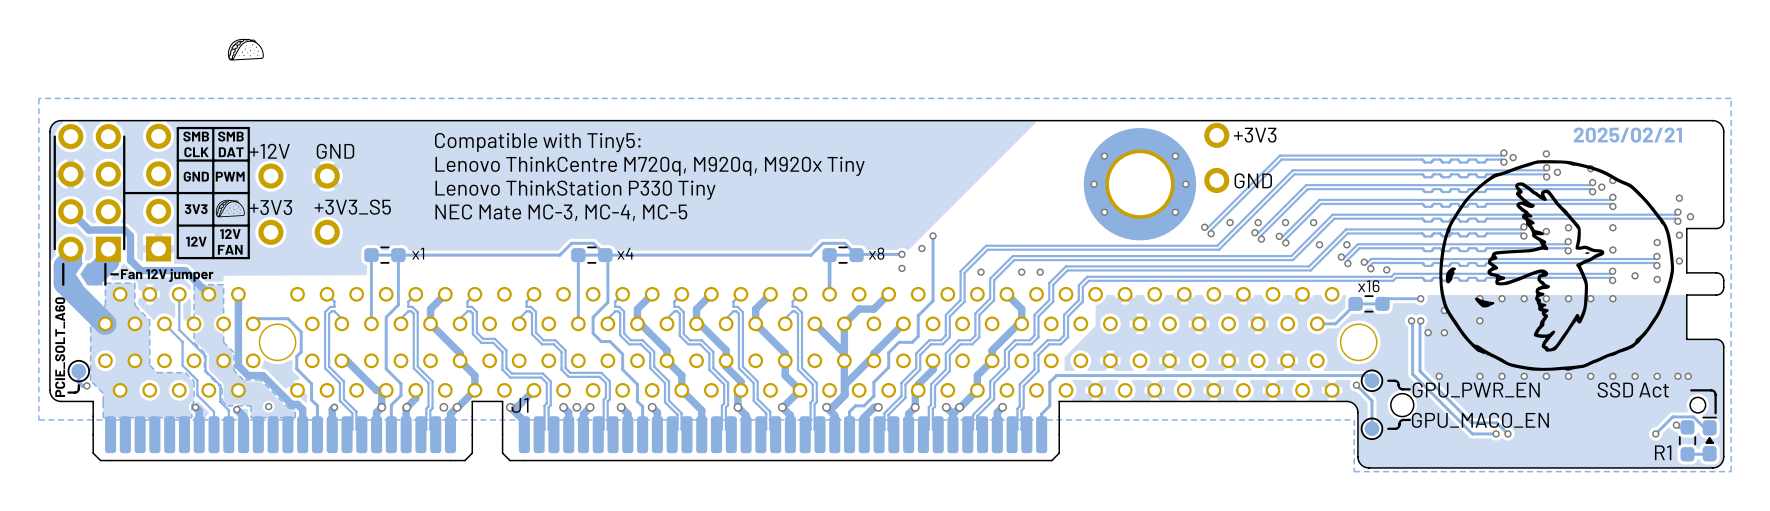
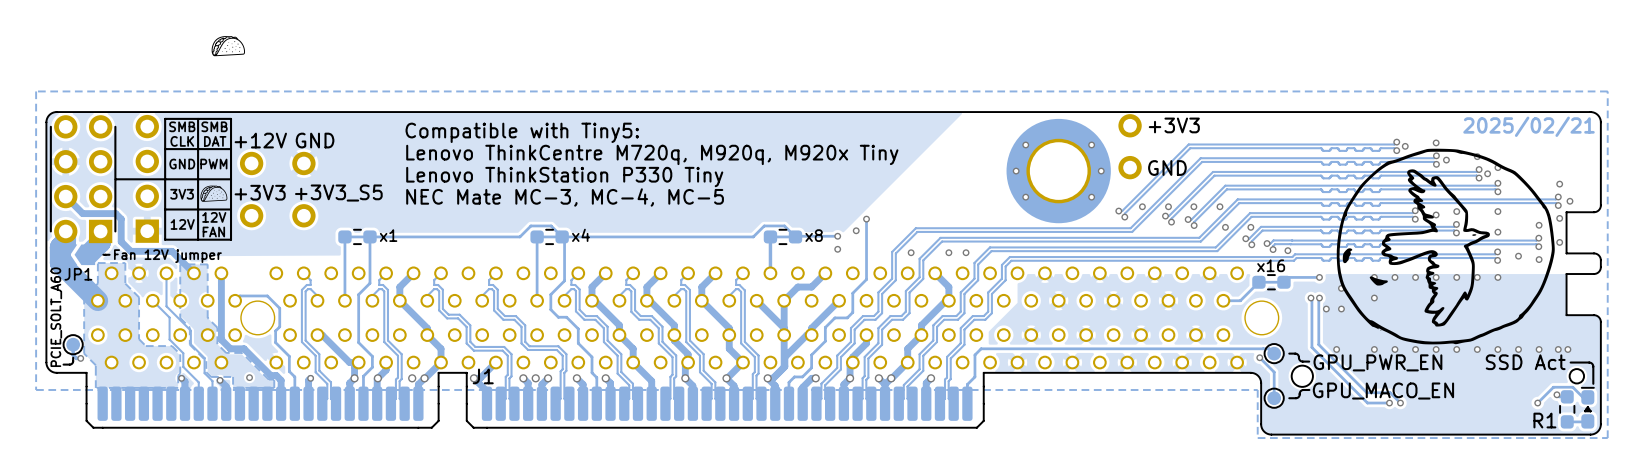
line: (63, 263) (63, 284) -> none
line: (105, 263) (105, 284) -> none
JP1 name: none -> JP1 (78, 274)

